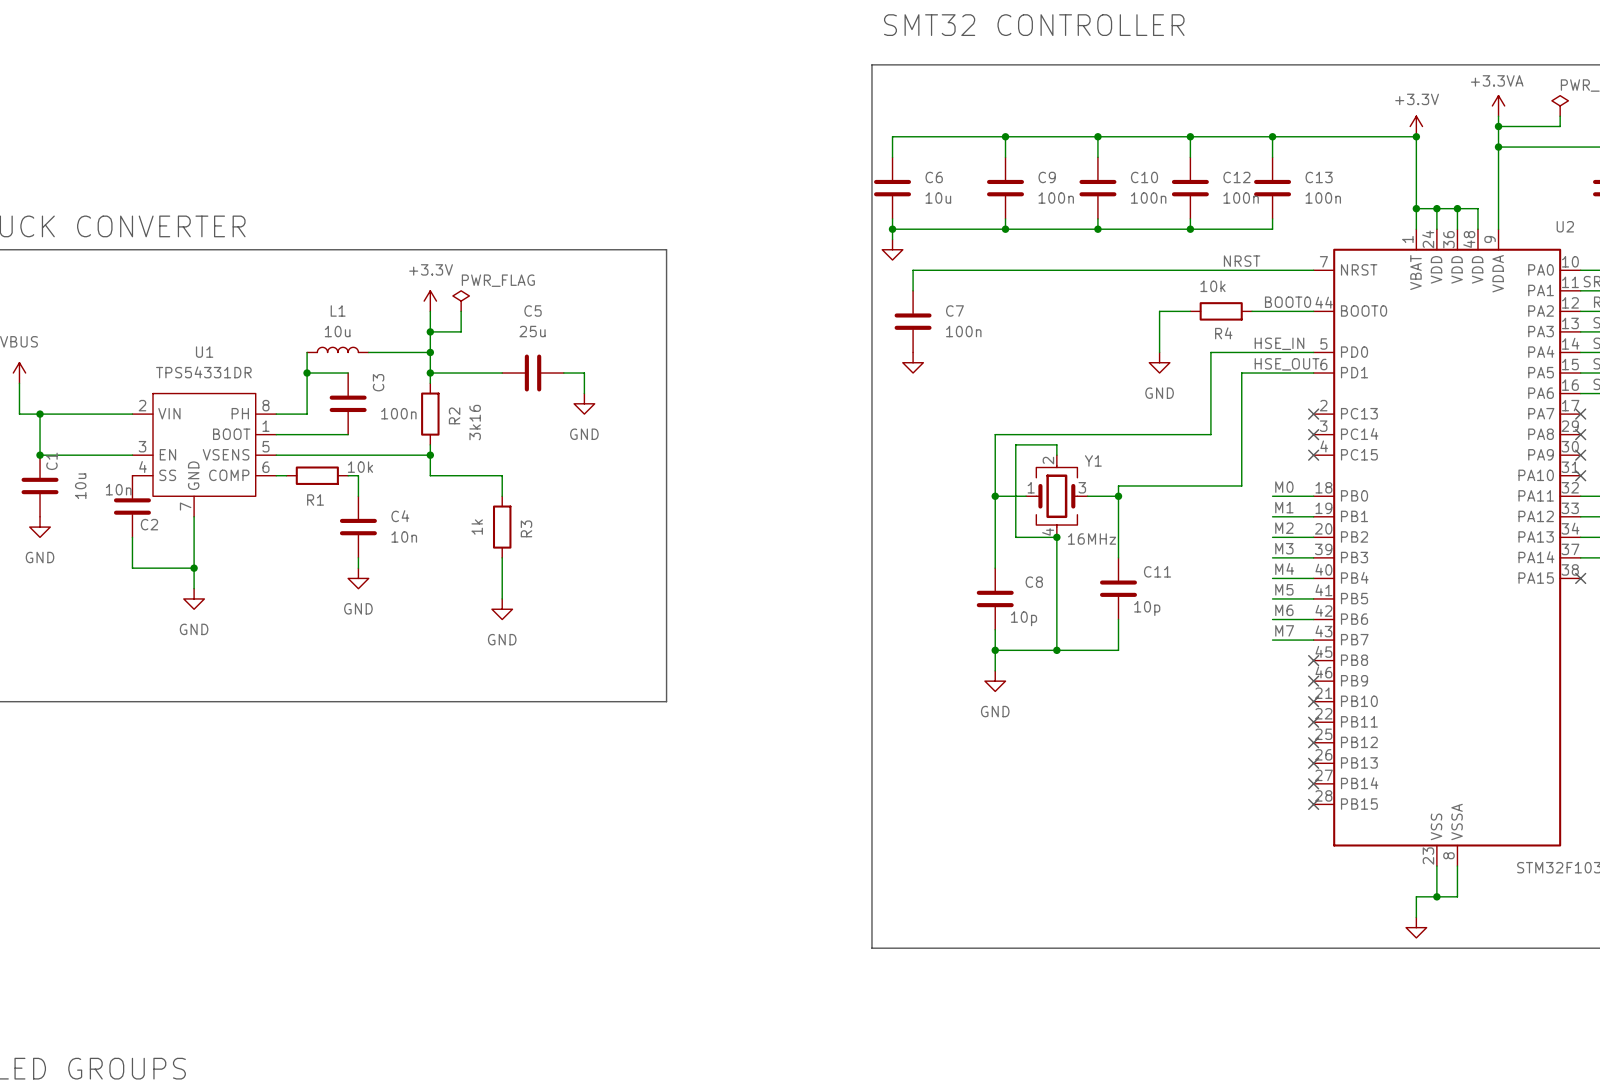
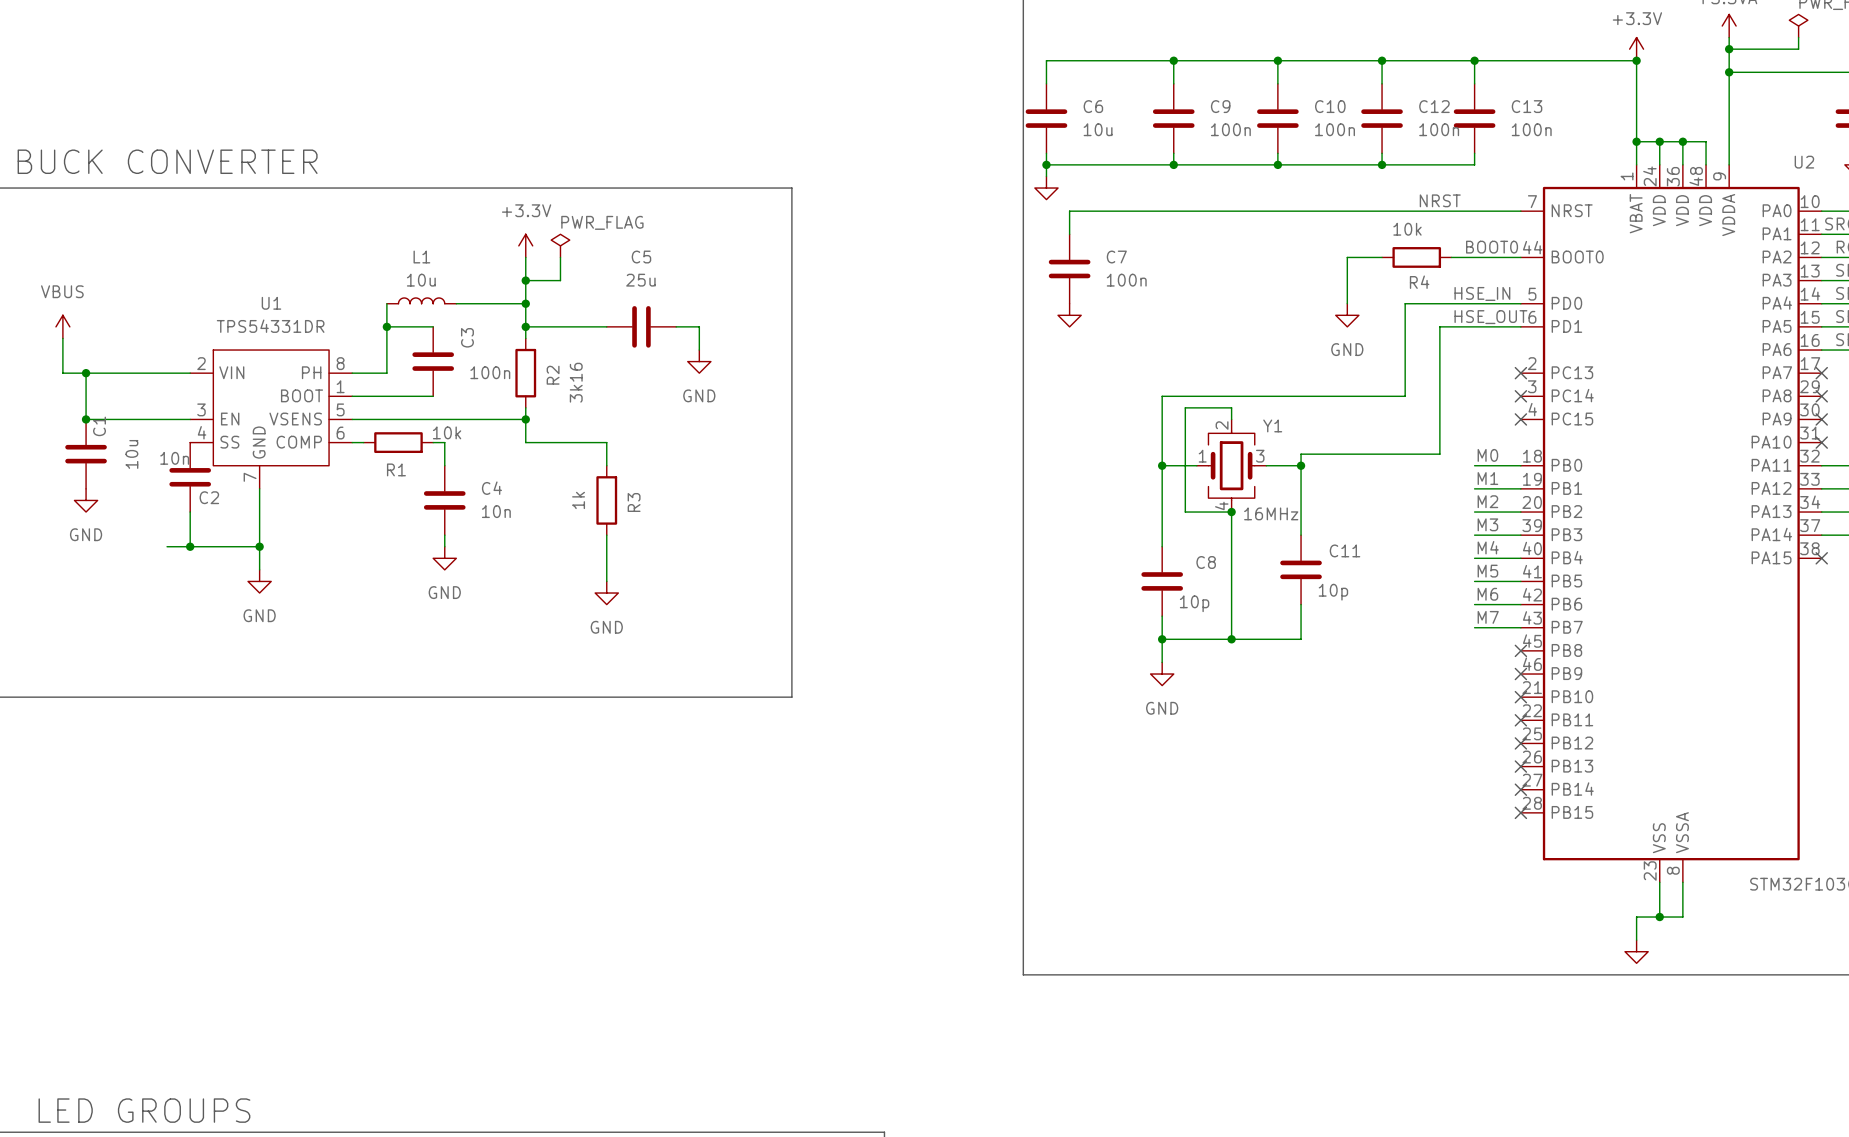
wire: none -> (167, 546) (190, 546)
junction: none -> (190, 546)

